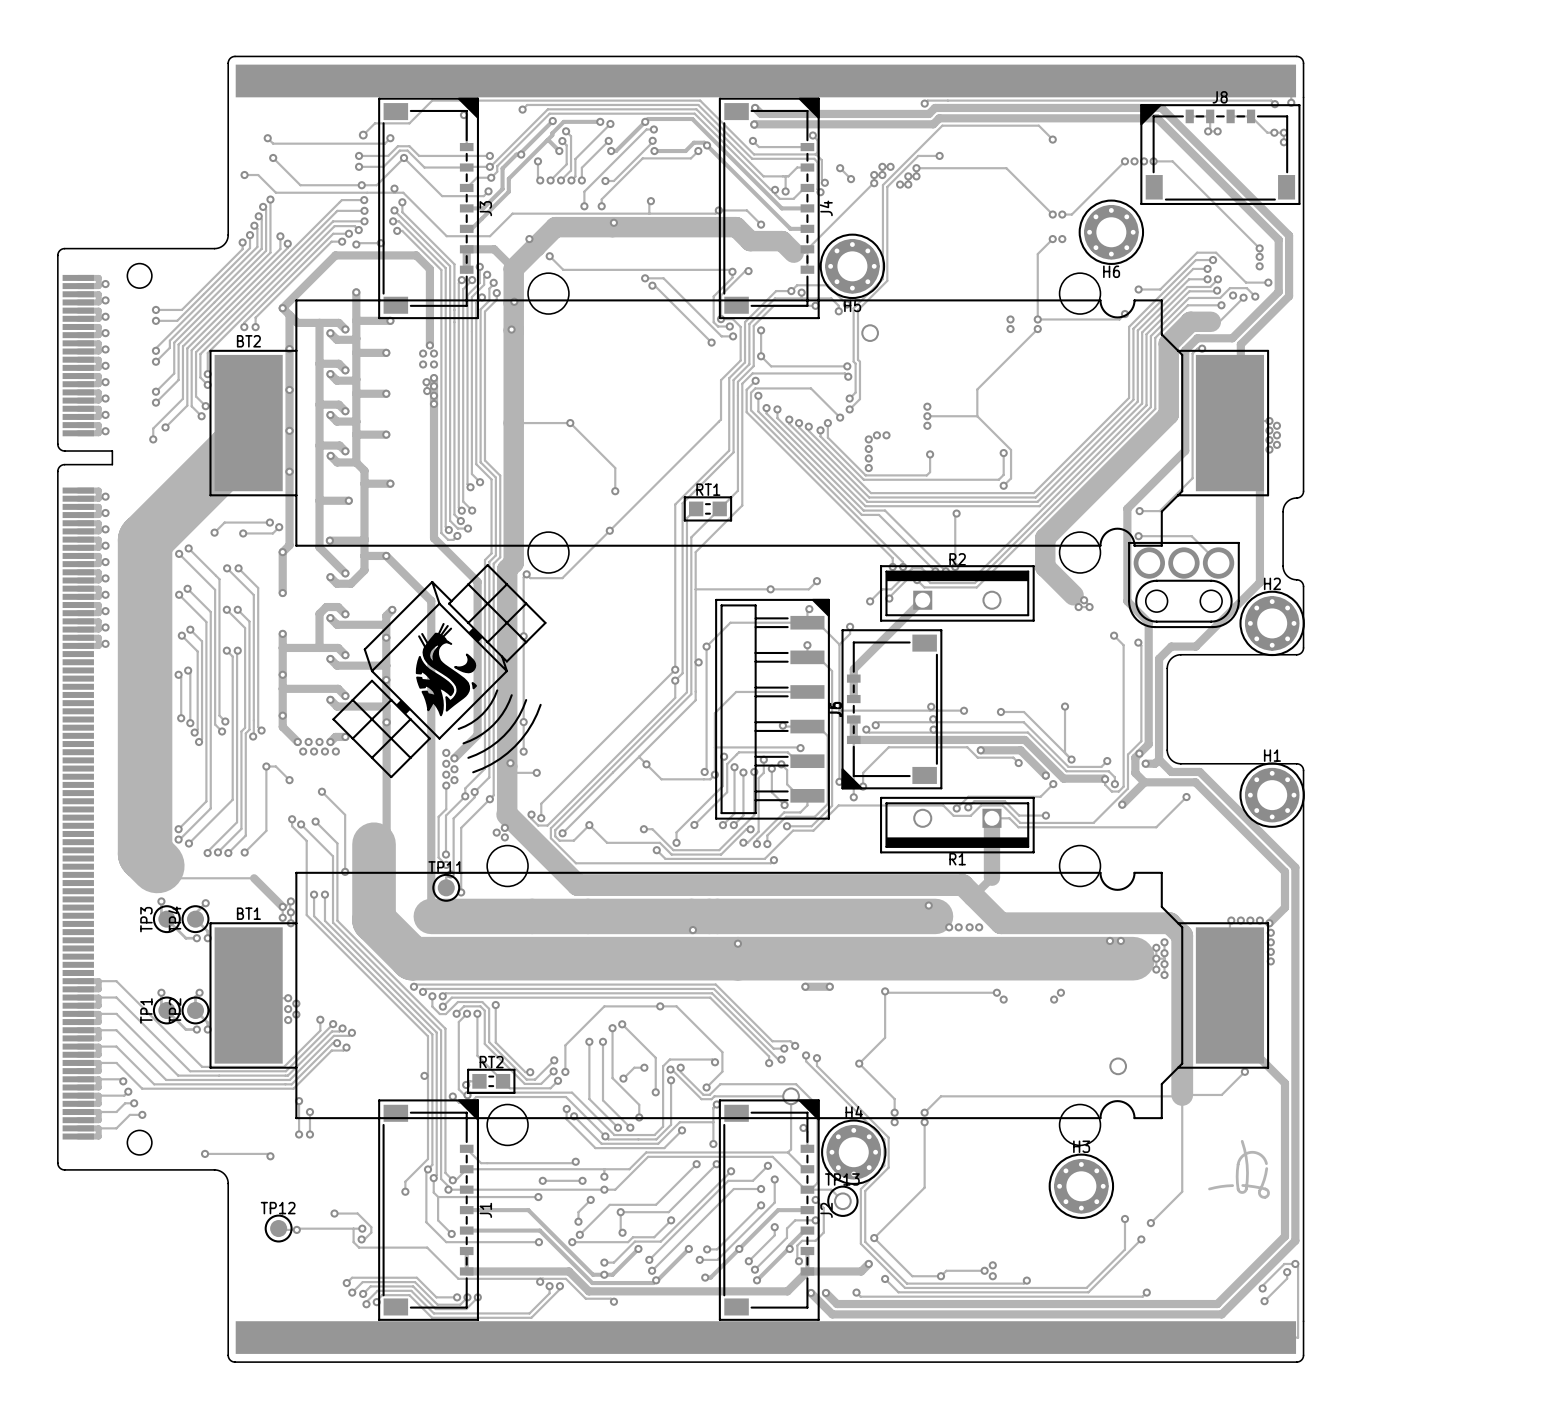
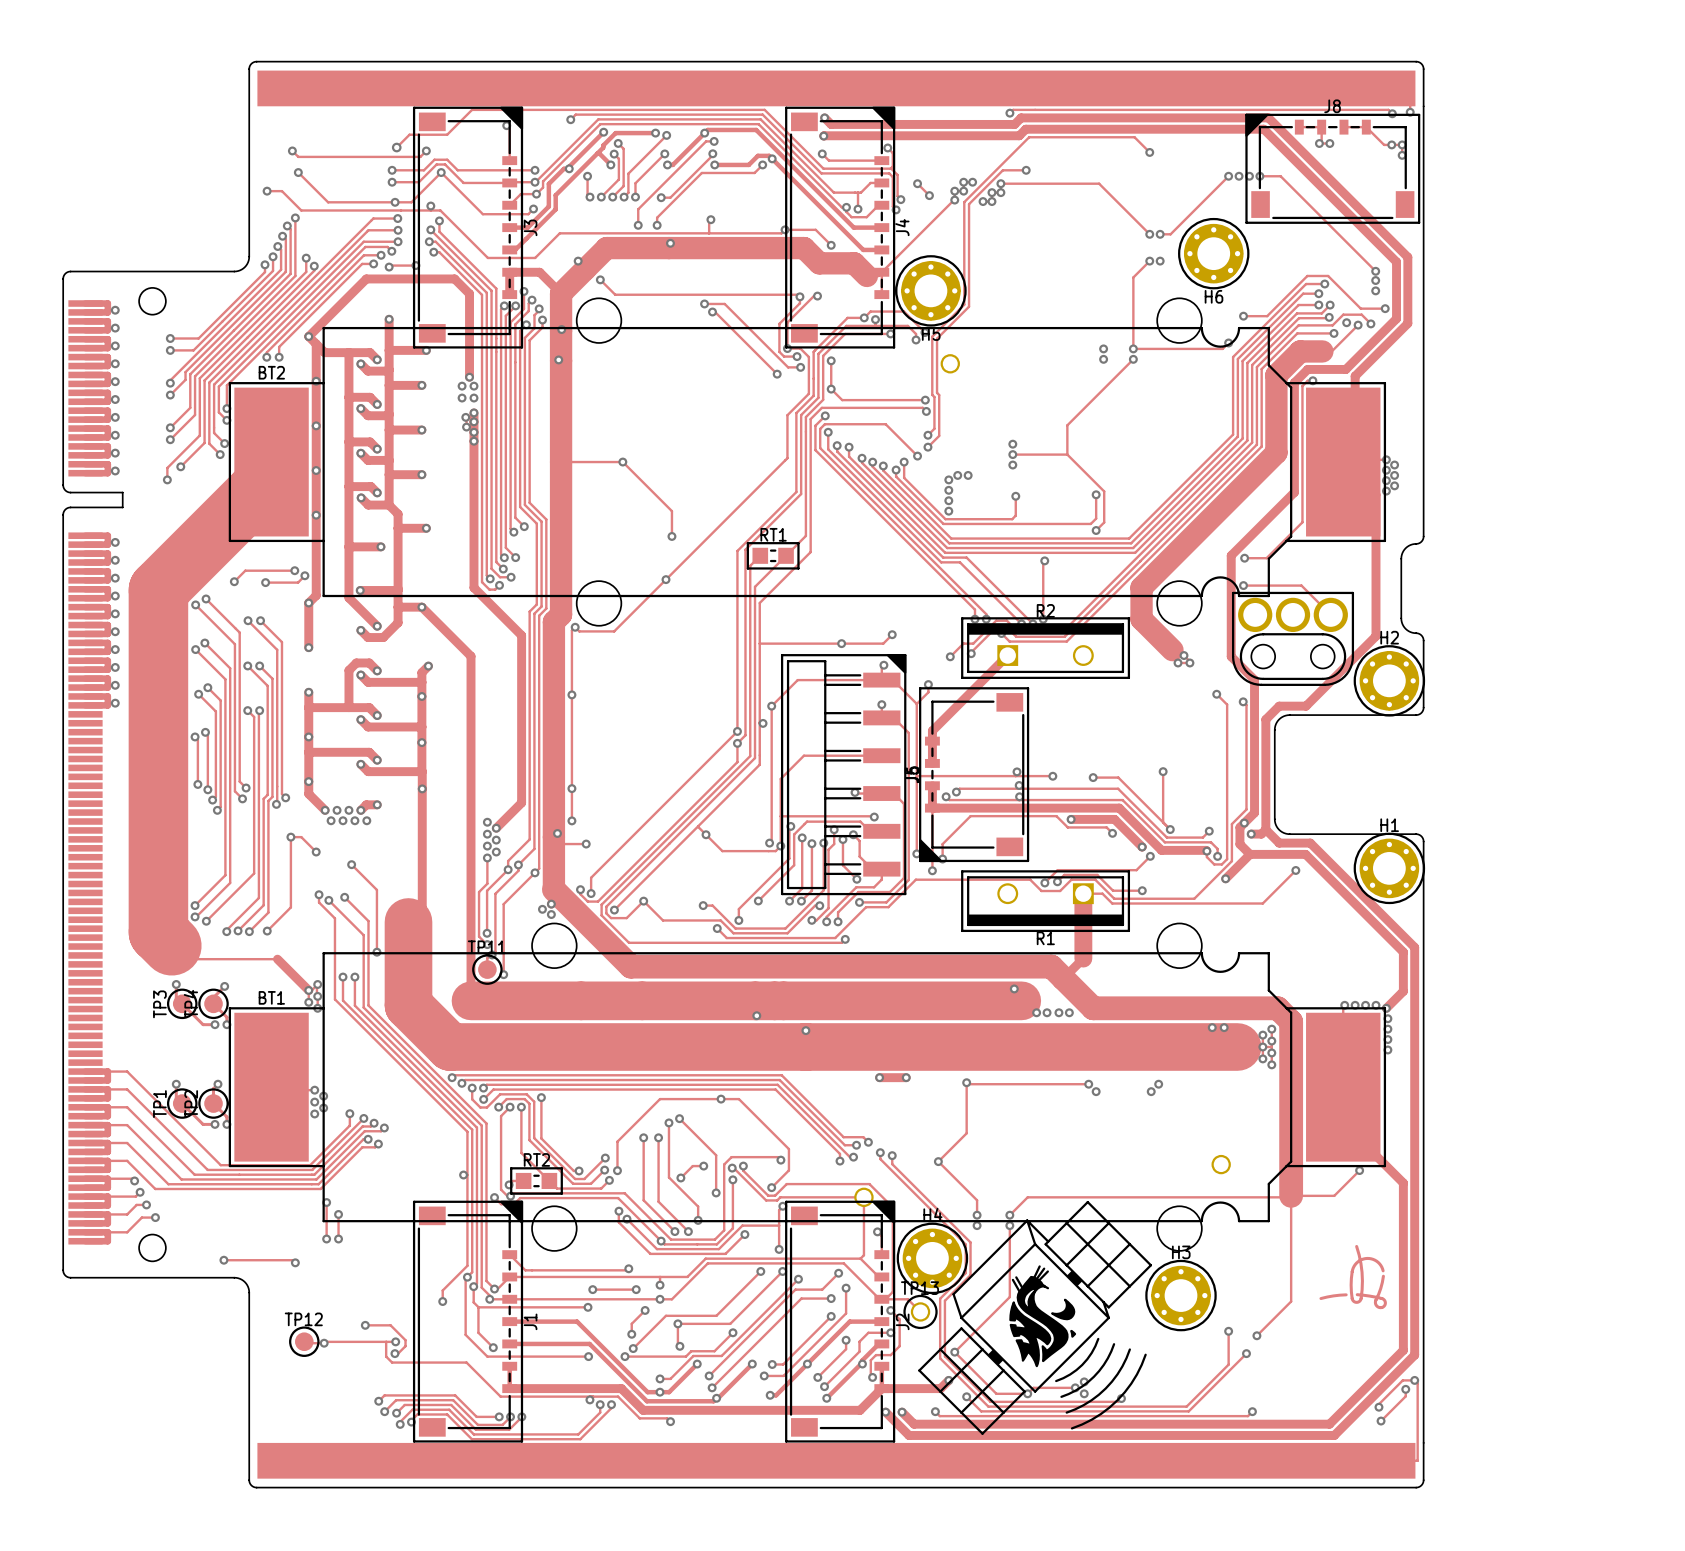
drawing: [332, 564, 547, 779] -> none
drawing: none -> [918, 1201, 1153, 1435]

